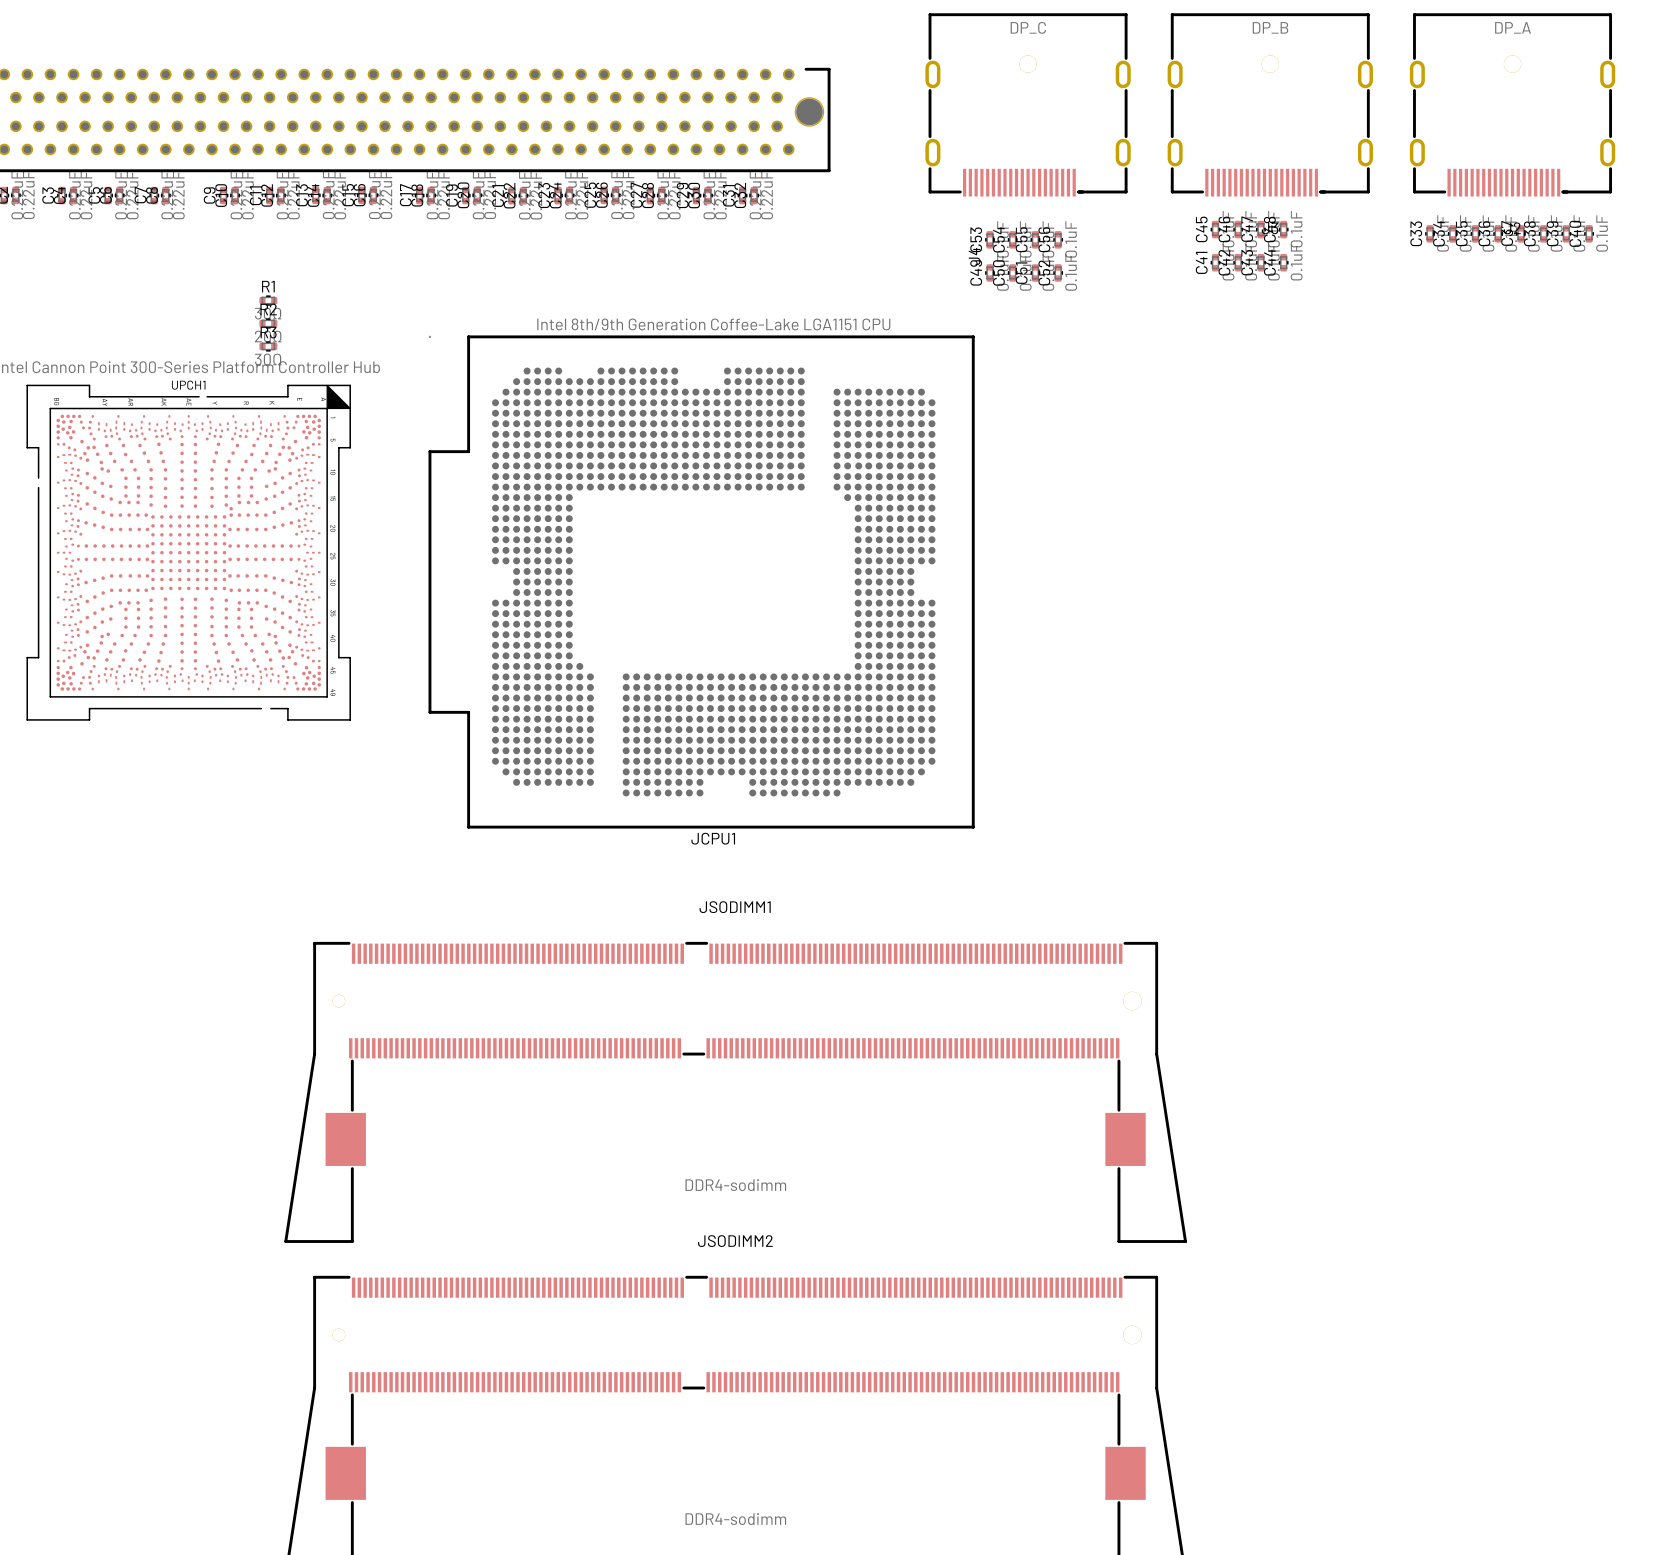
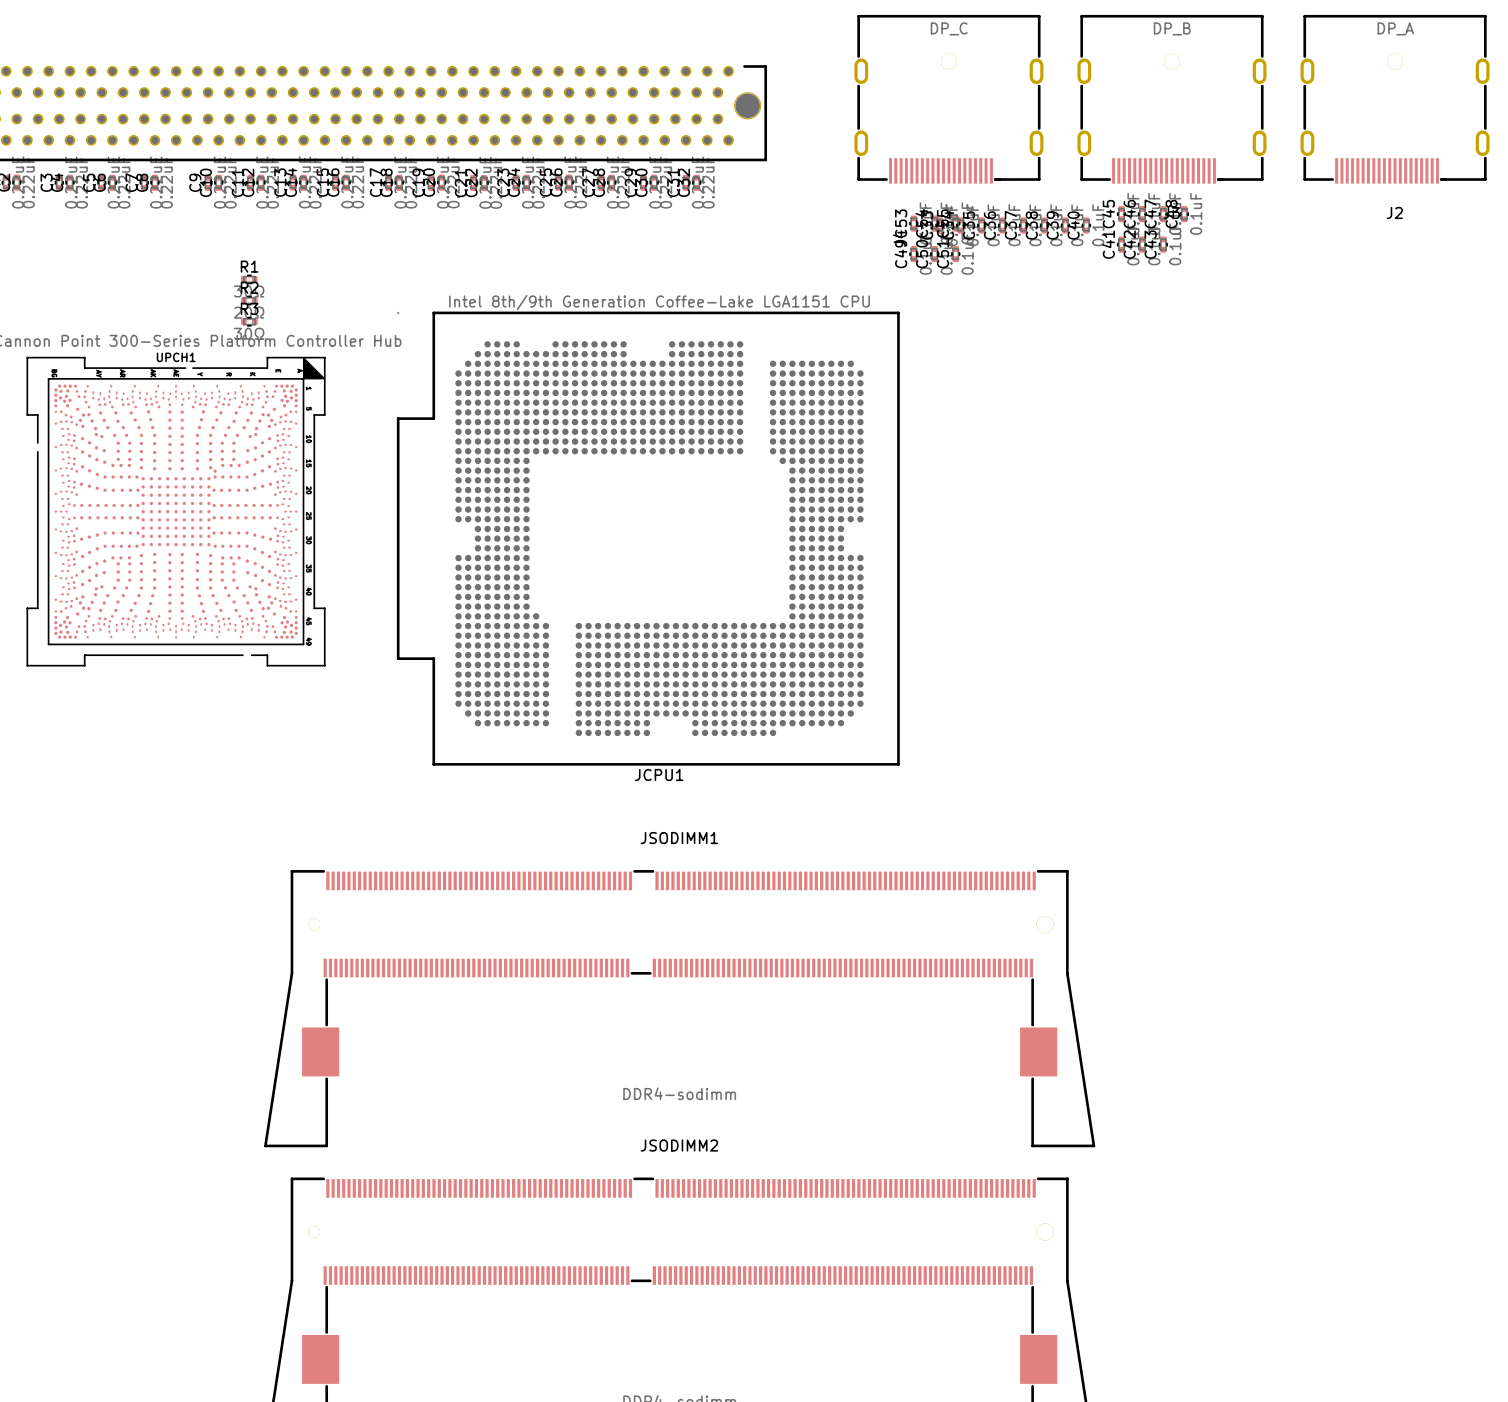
C33 position: (1430, 233) -> (939, 225)
C34 position: (1452, 233) -> (960, 225)
C35 position: (1475, 233) -> (981, 225)
C36 position: (1498, 233) -> (1002, 225)
C37 position: (1520, 233) -> (1023, 225)
C38 position: (1543, 233) -> (1044, 225)
C39 position: (1566, 233) -> (1065, 225)
C40 position: (1589, 233) -> (1086, 225)
C56: 0.1uF (1058, 239) -> none
C44: 0.1uF (1283, 262) -> none
C52: 0.1uF (1058, 272) -> none

